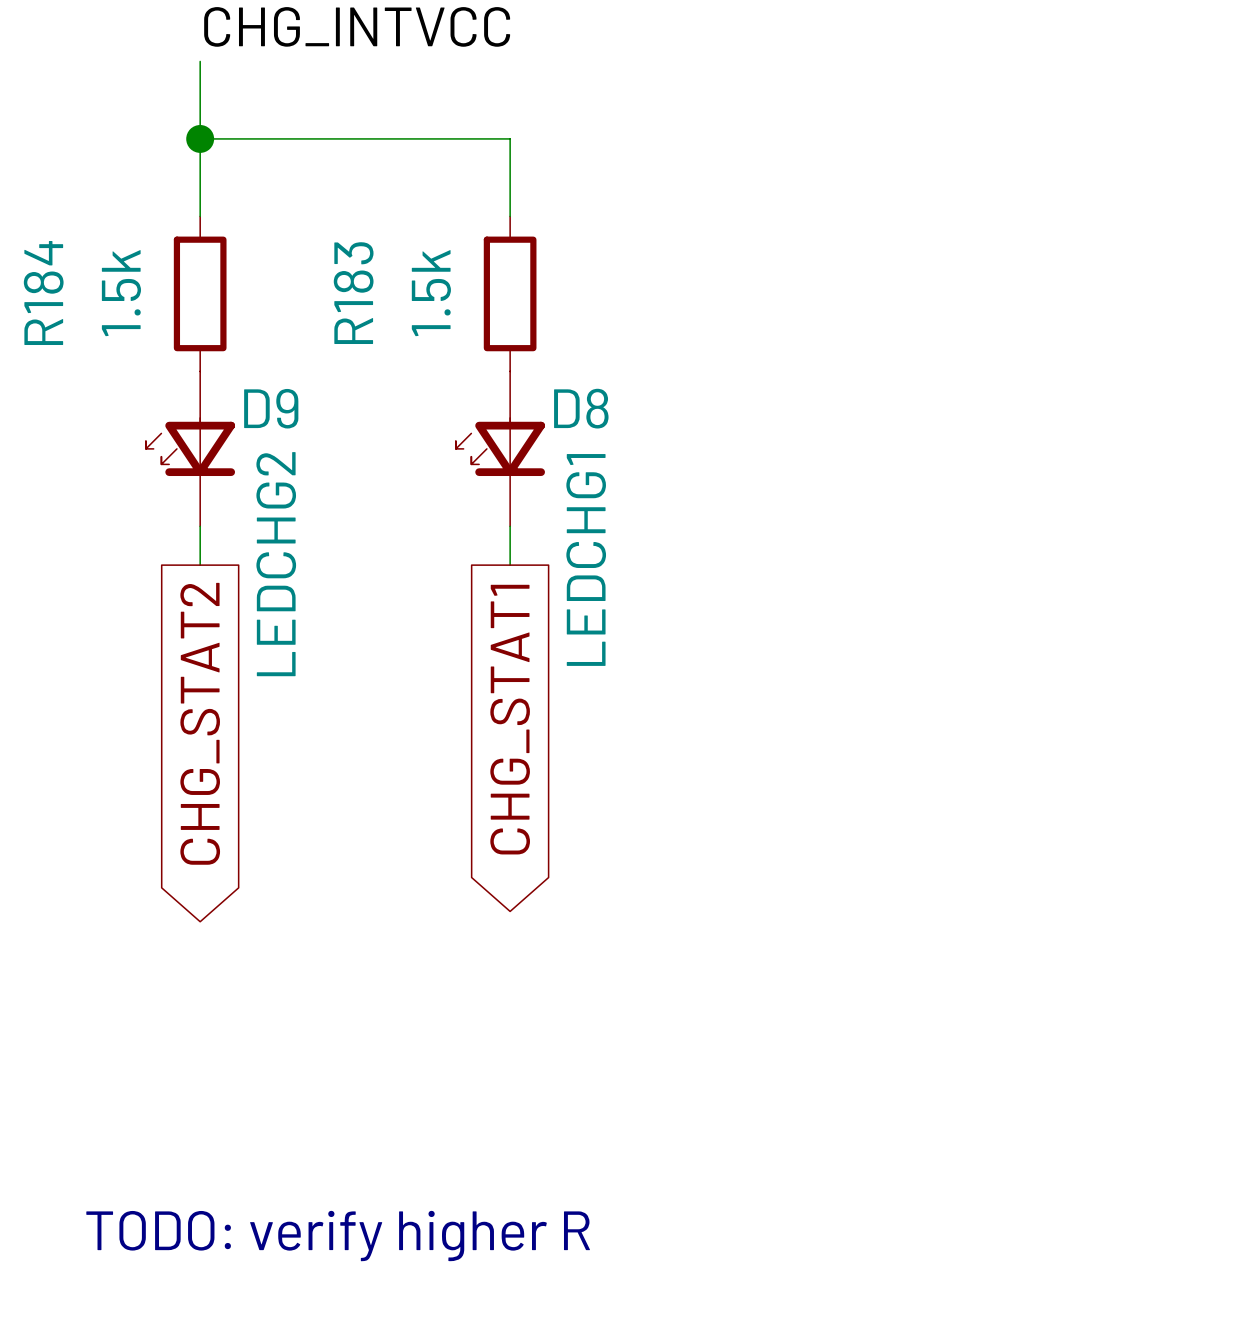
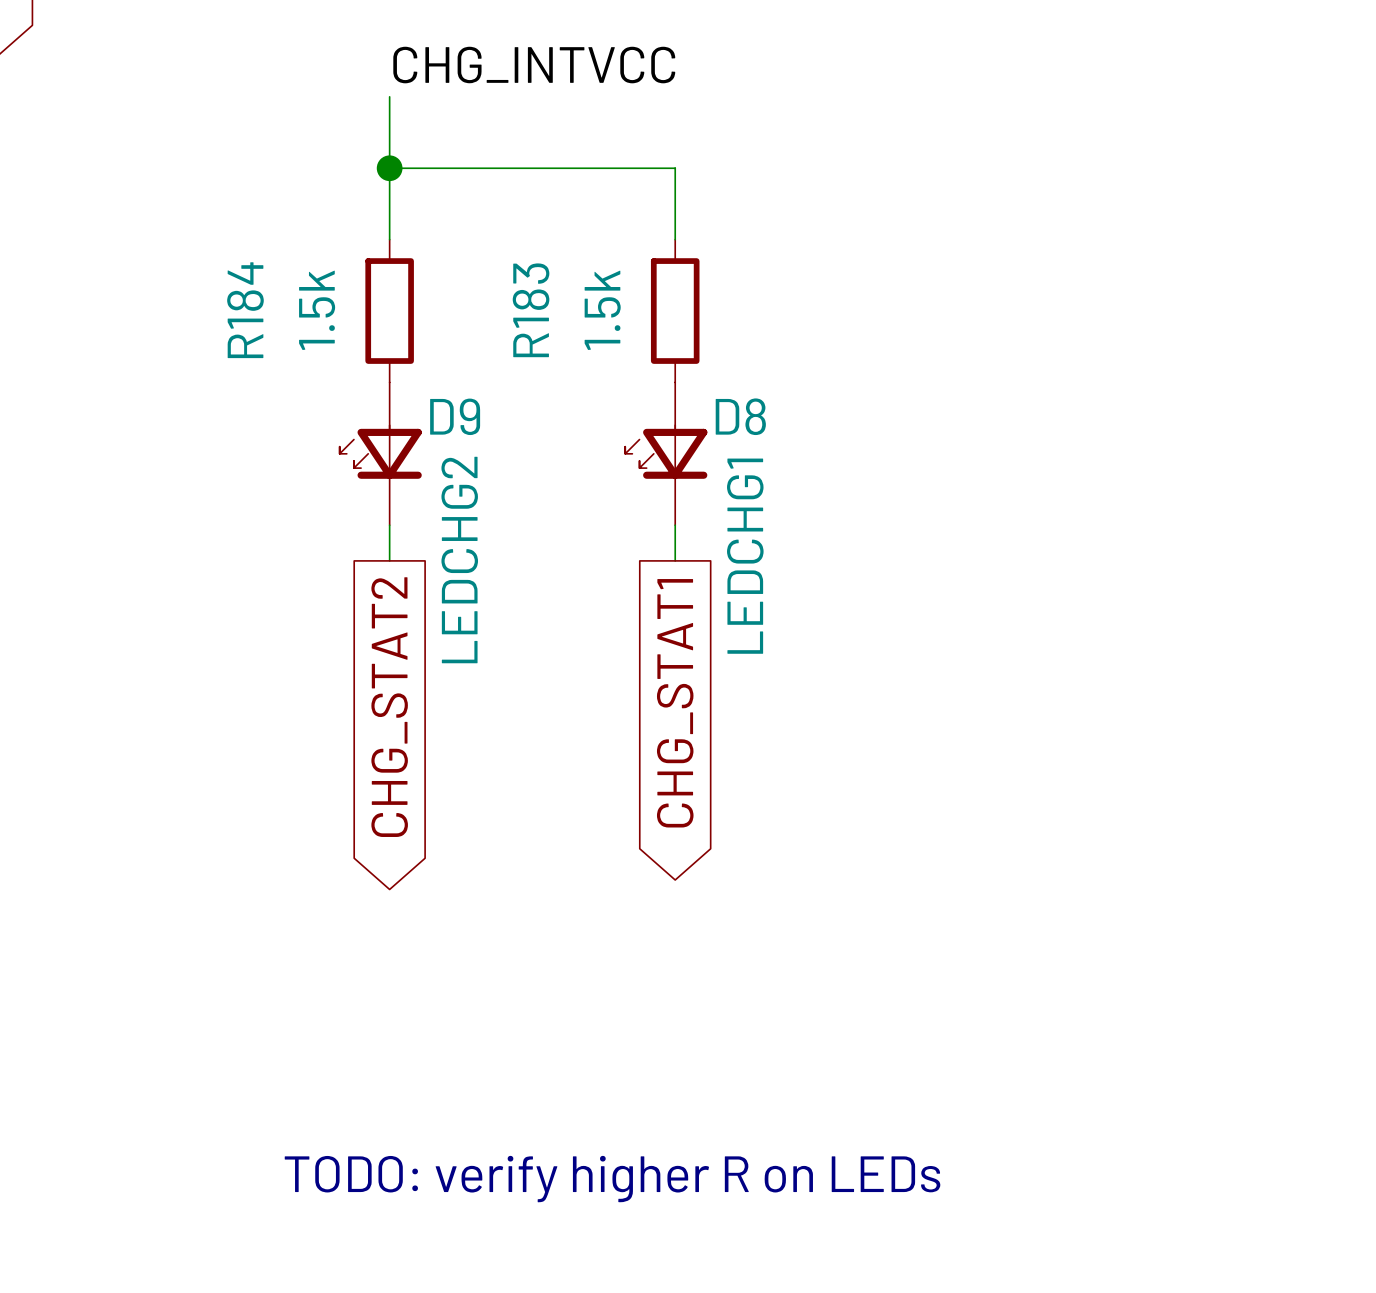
text: TODO: verify higher R (338, 1236) -> TODO: verify higher R on LEDs (612, 1179)

